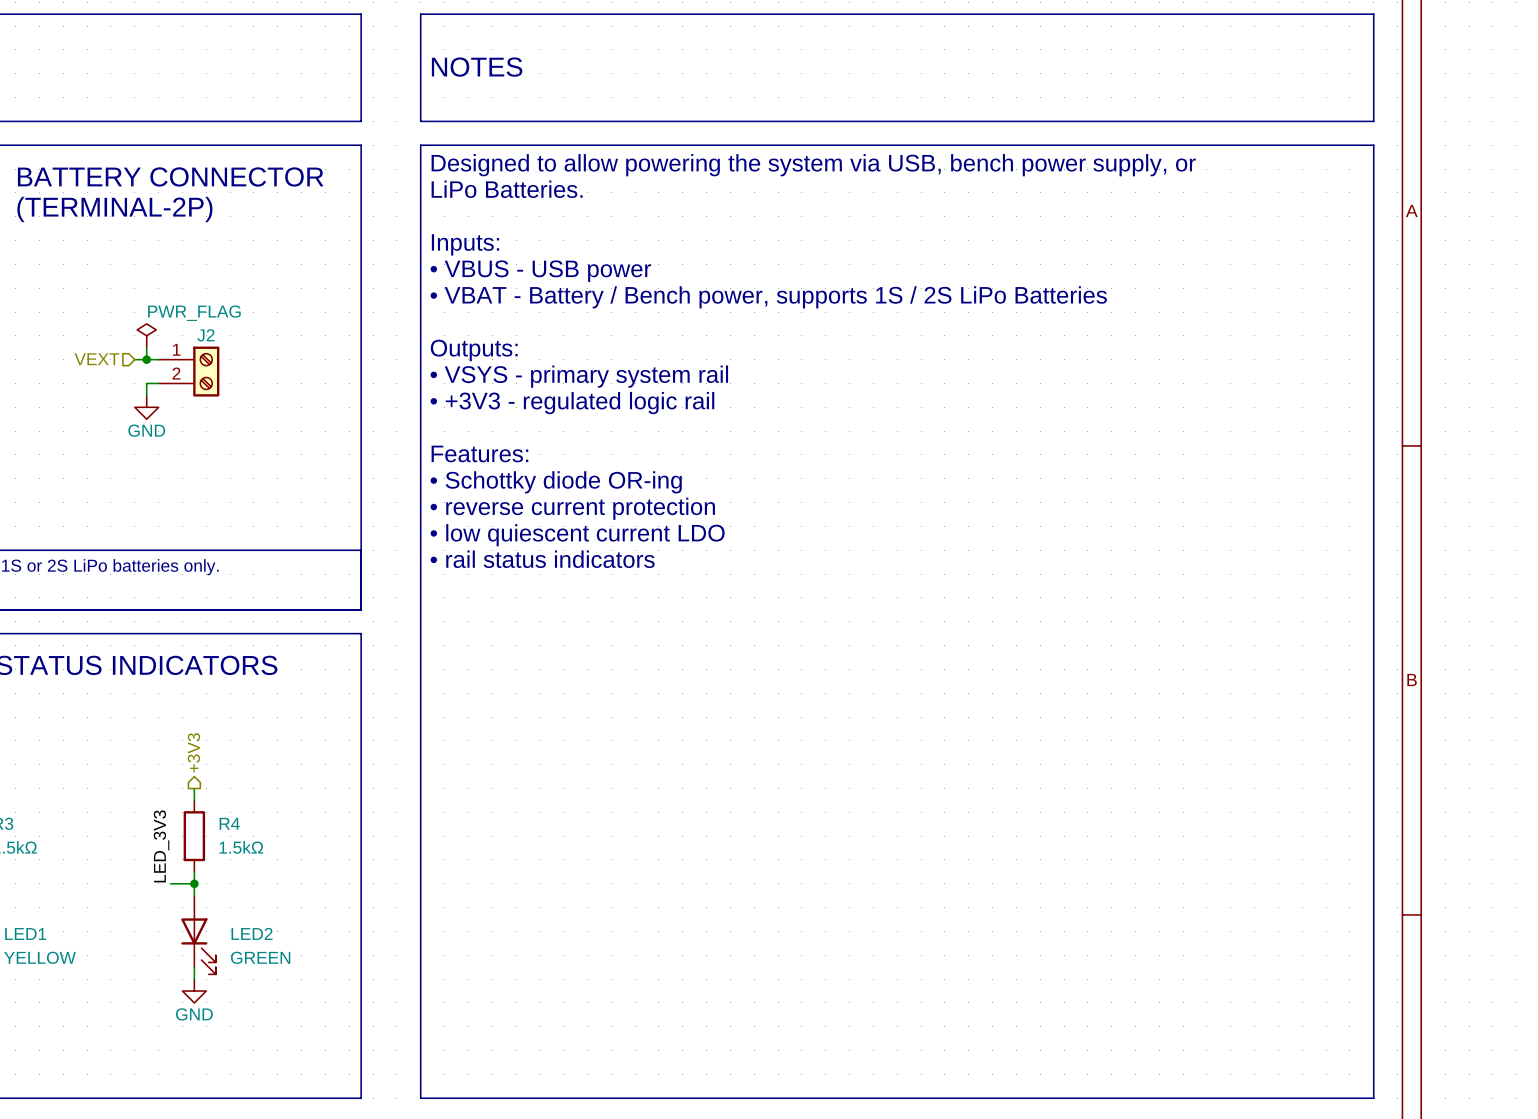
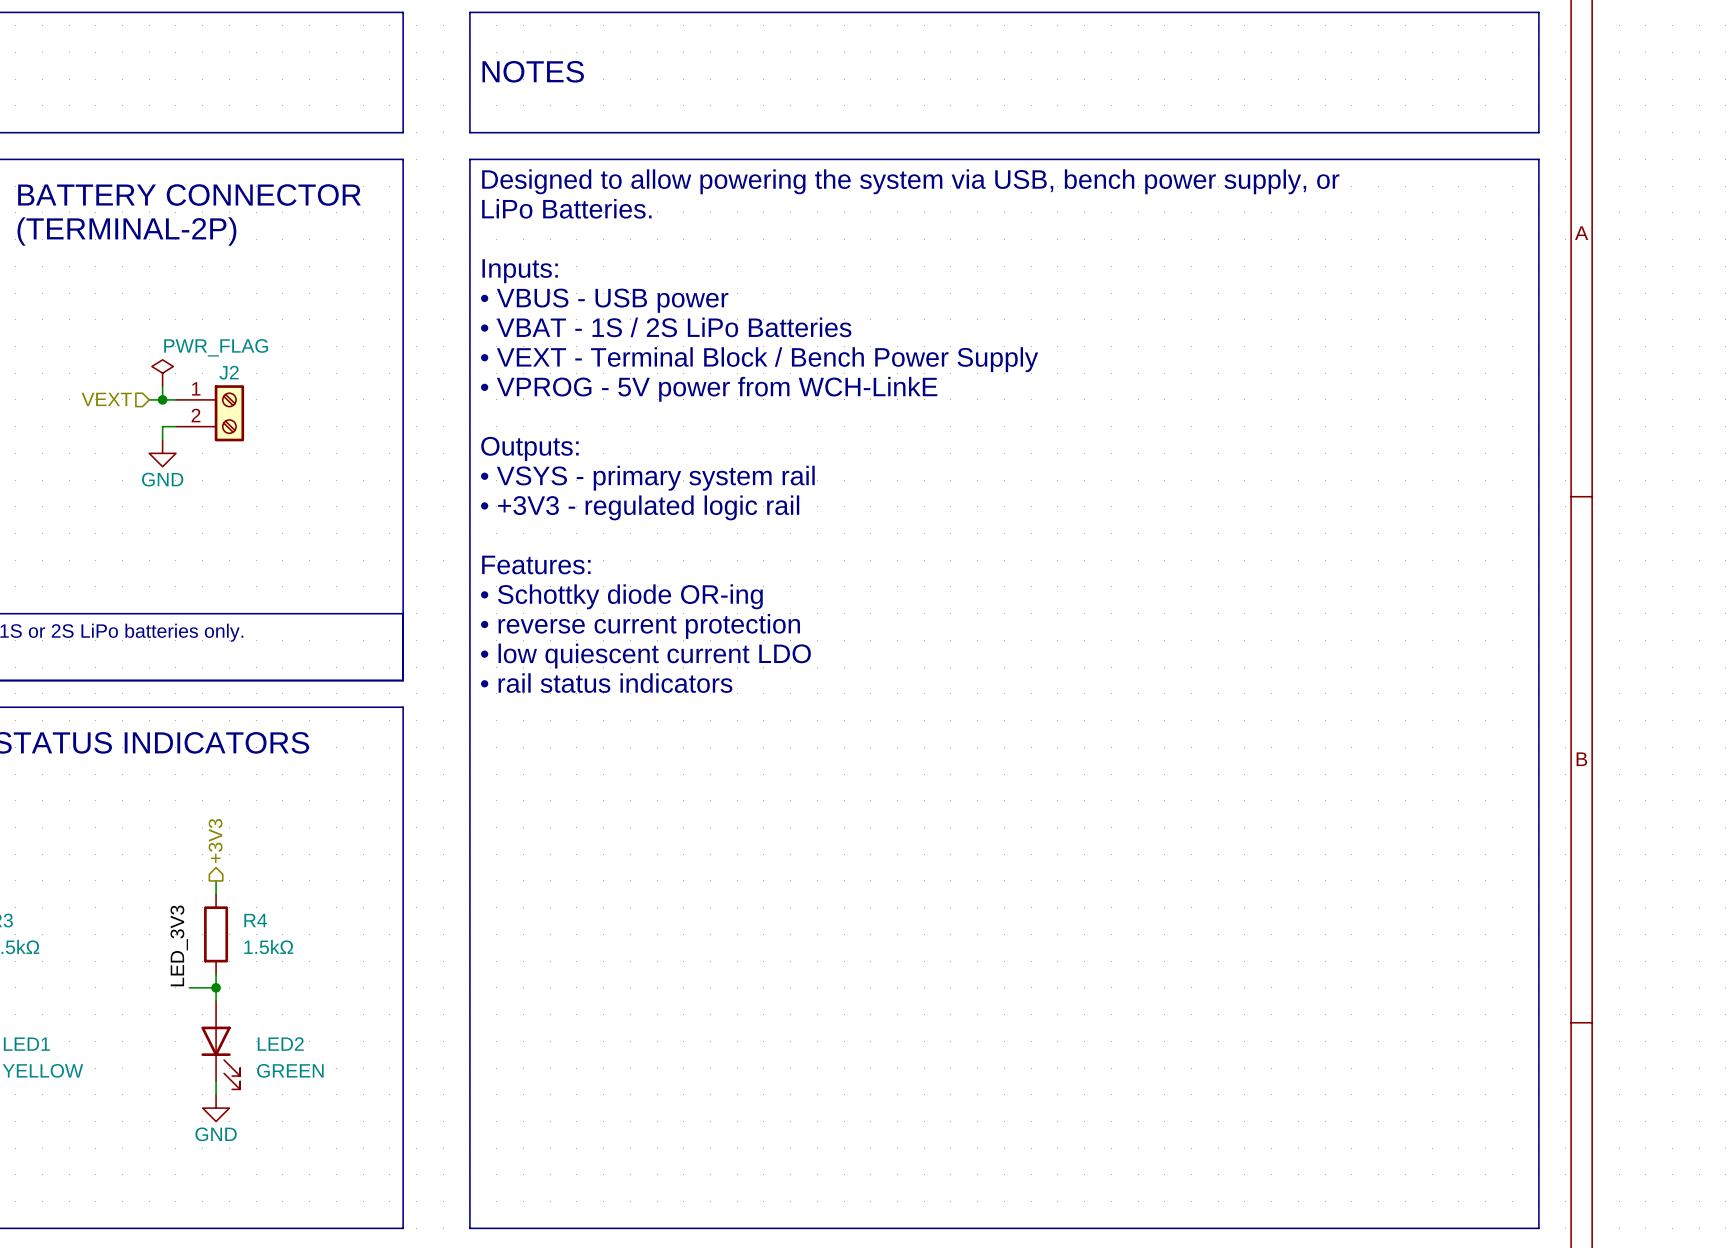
text: • VBAT - Battery / Bench power, supports 1S / 2S LiPo Batteries (768, 297) -> • VBAT - 1S / 2S LiPo Batteries (666, 327)
text: none -> • VEXT - Terminal Block / Bench Power Supply (759, 359)
text: Outputs: (474, 350) -> • VPROG - 5V power from WCH-LinkE (709, 389)
text position: • VSYS - primary system rail (579, 376) -> • VSYS - primary system rail (647, 478)
text: • +3V3 - regulated logic rail (572, 403) -> Outputs: (529, 448)
text: Features: (479, 453) -> • +3V3 - regulated logic rail (640, 507)
text: • Schottky diode OR-ing (556, 482) -> none
text: • reverse current protection (572, 508) -> Features: (536, 565)
text: • low quiescent current LDO (577, 535) -> • Schottky diode OR-ing (621, 596)
text: • rail status indicators (542, 559) -> • reverse current protection (640, 626)
text: none -> • low quiescent current LDO (645, 656)
text: none -> • rail status indicators (606, 683)

